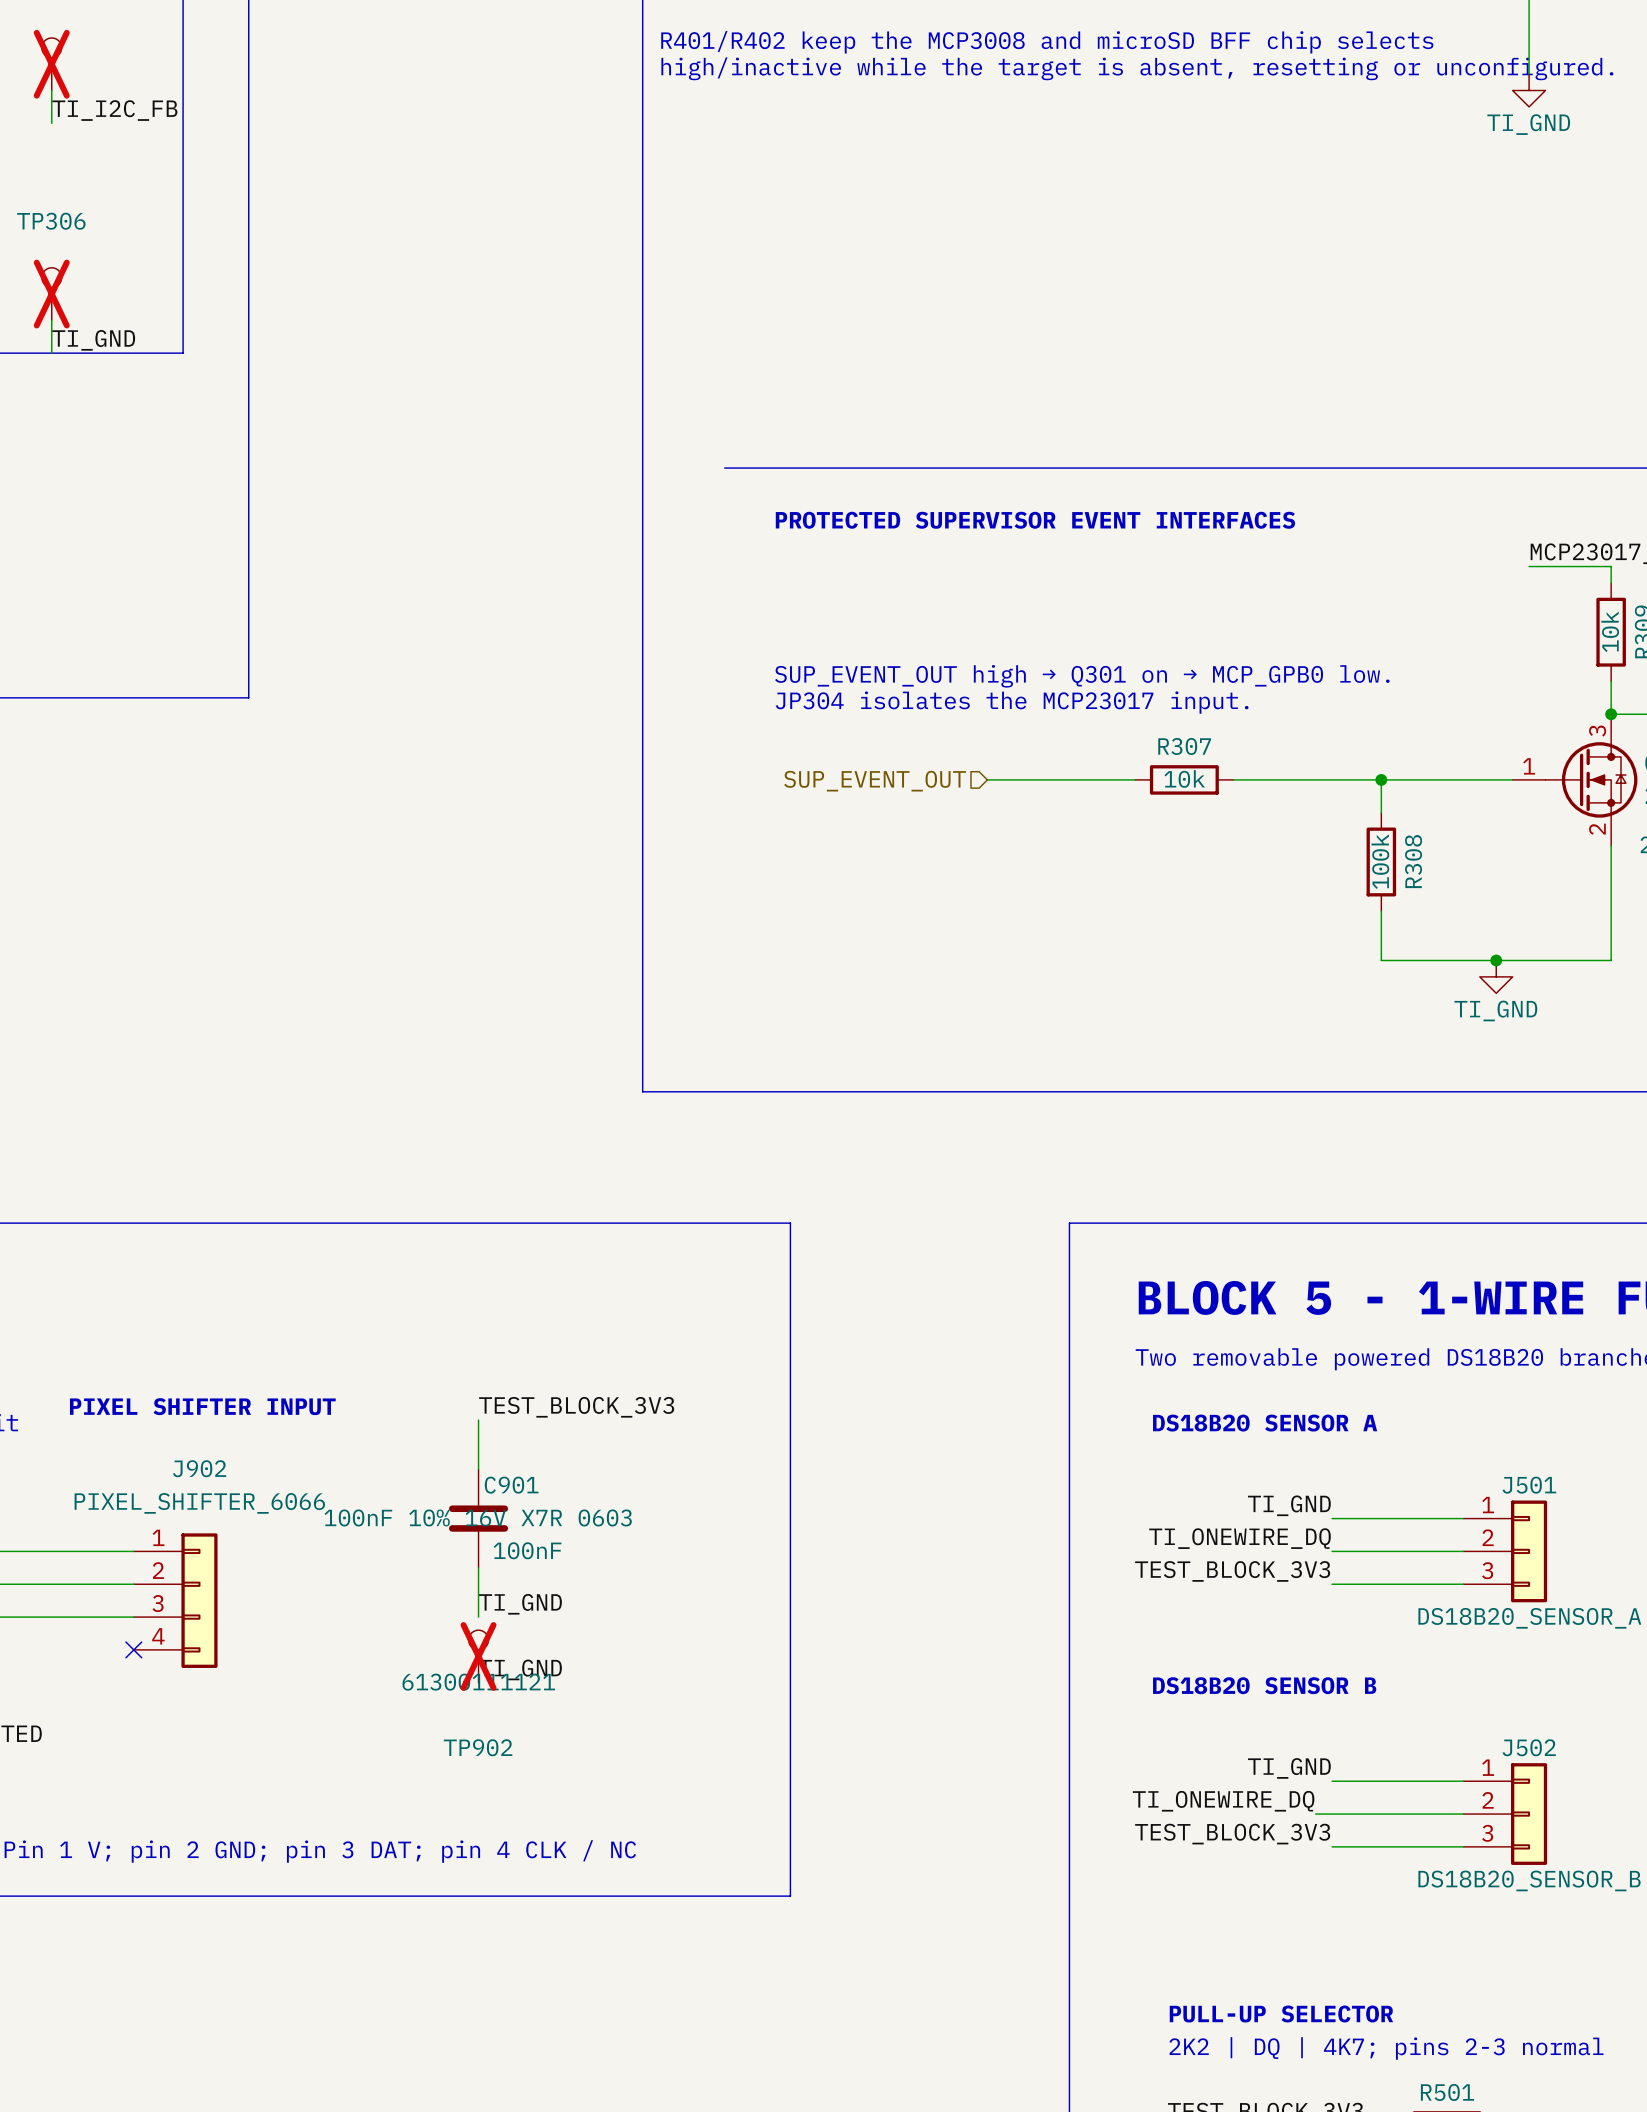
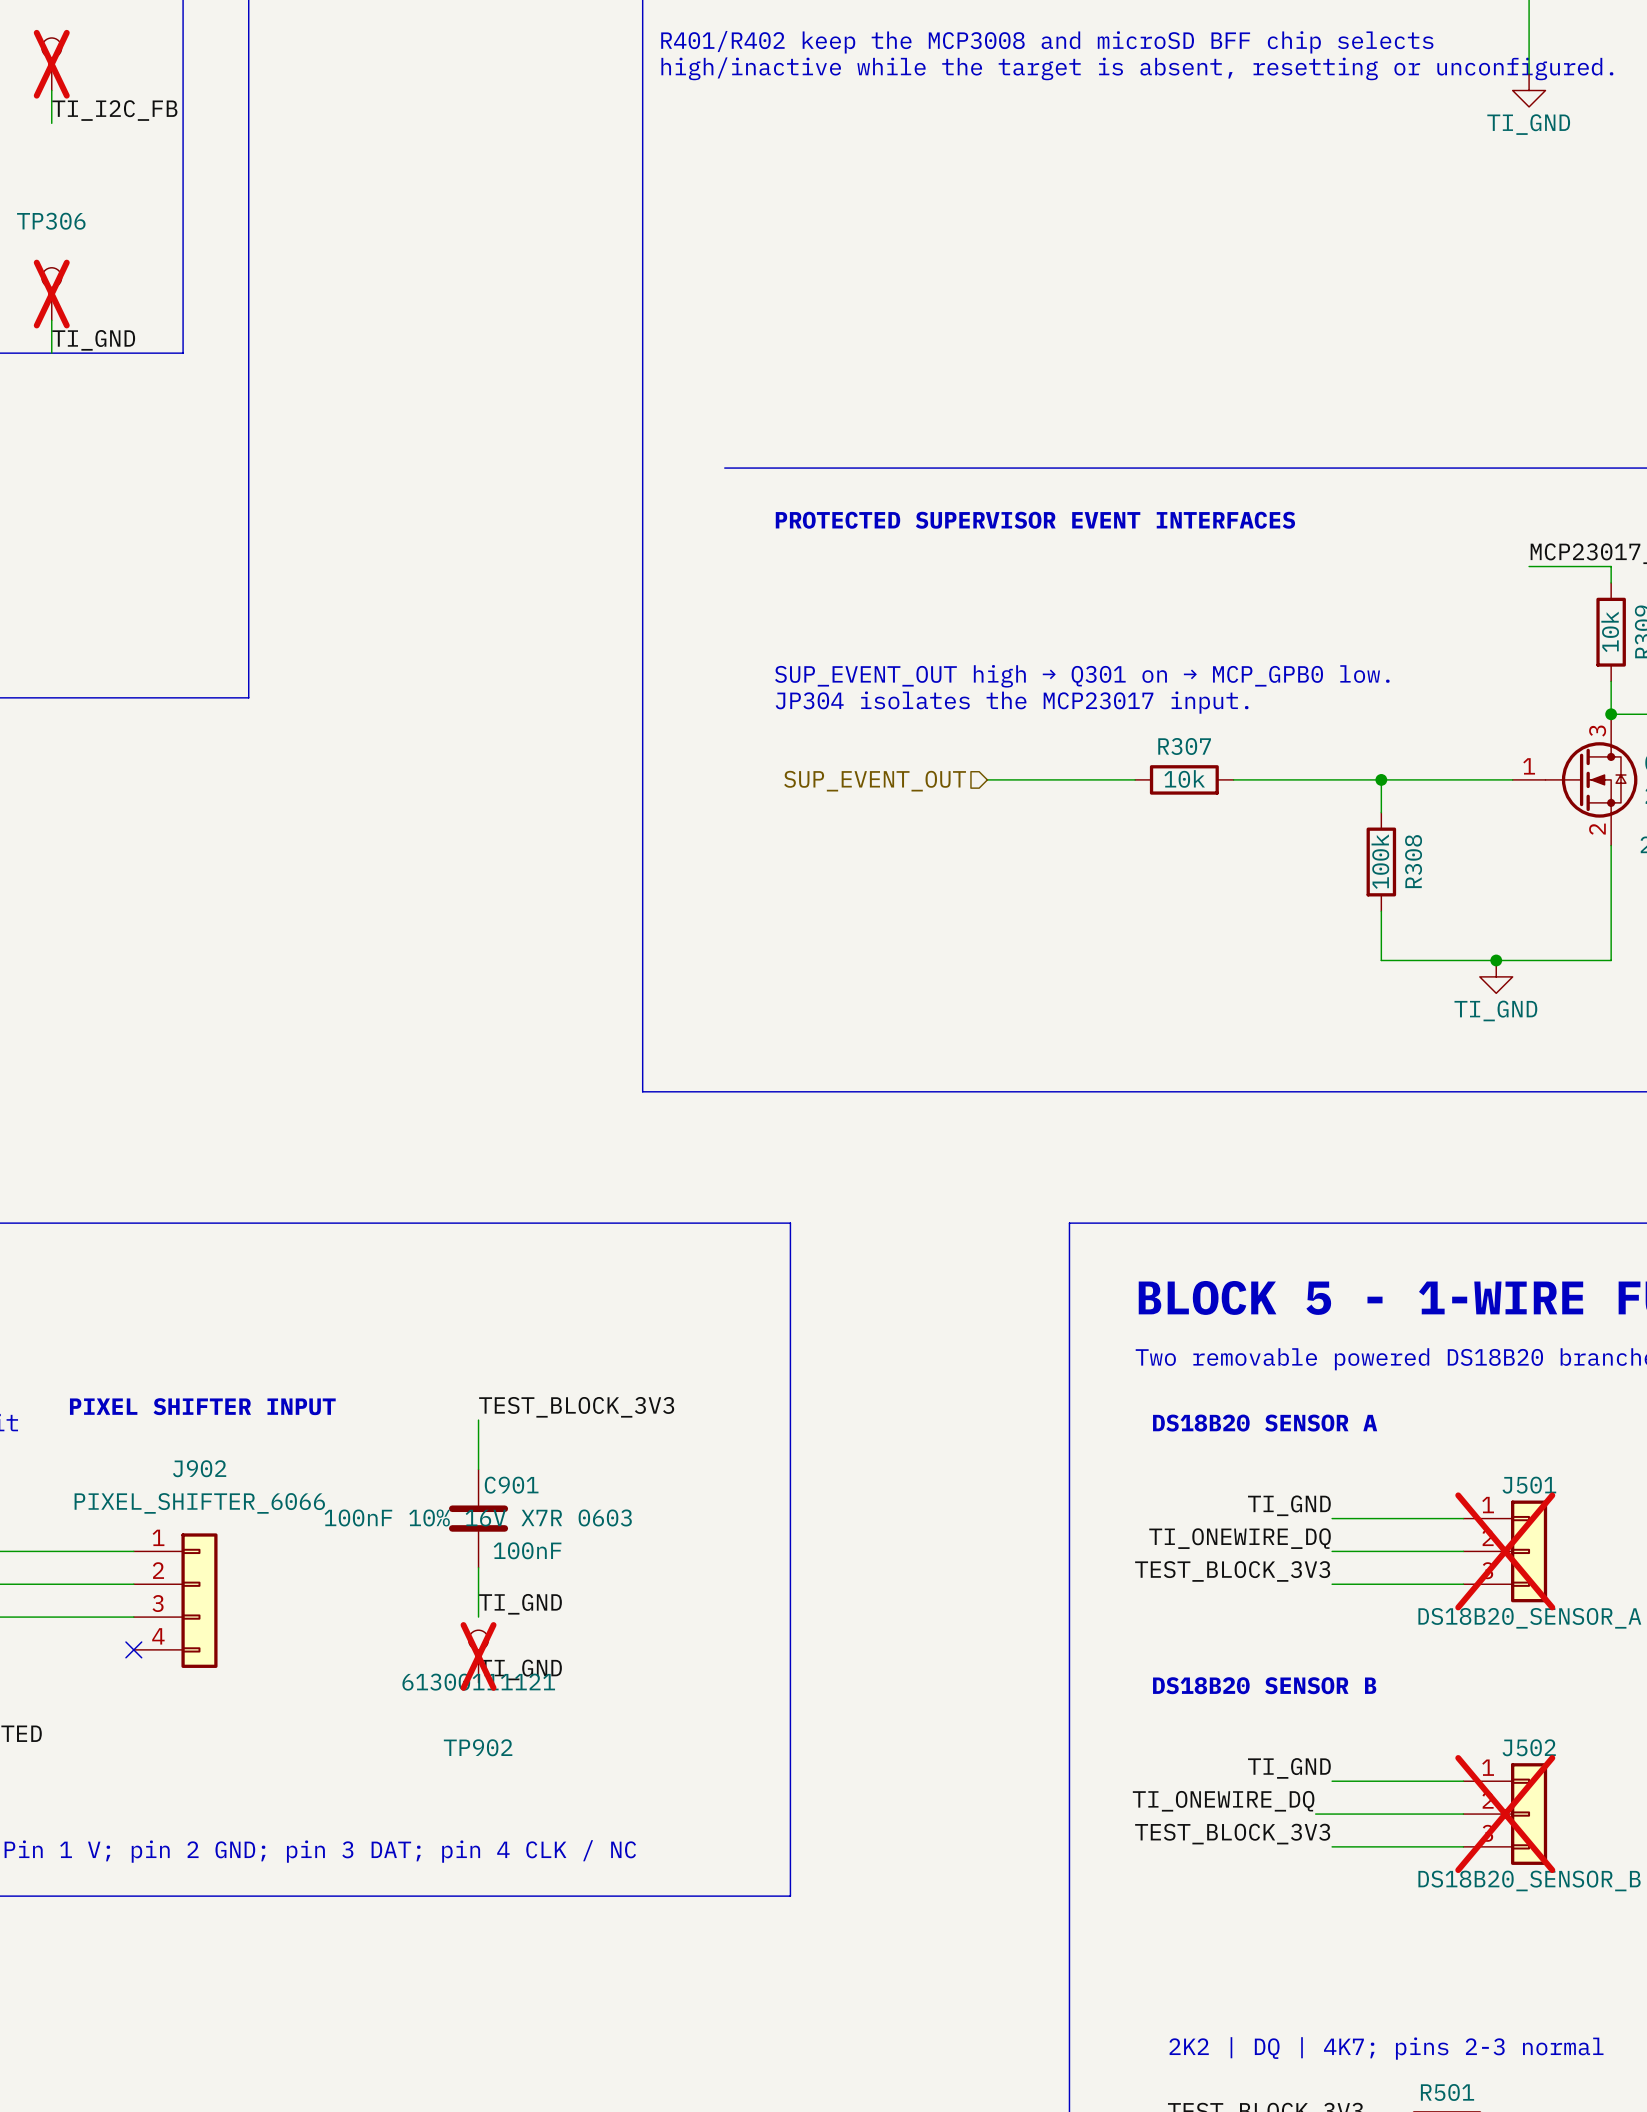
J501 do-not-place cross: none -> (1505, 1551)
J502 do-not-place cross: none -> (1505, 1814)
text: PULL-UP SELECTOR (1281, 2013) -> none

